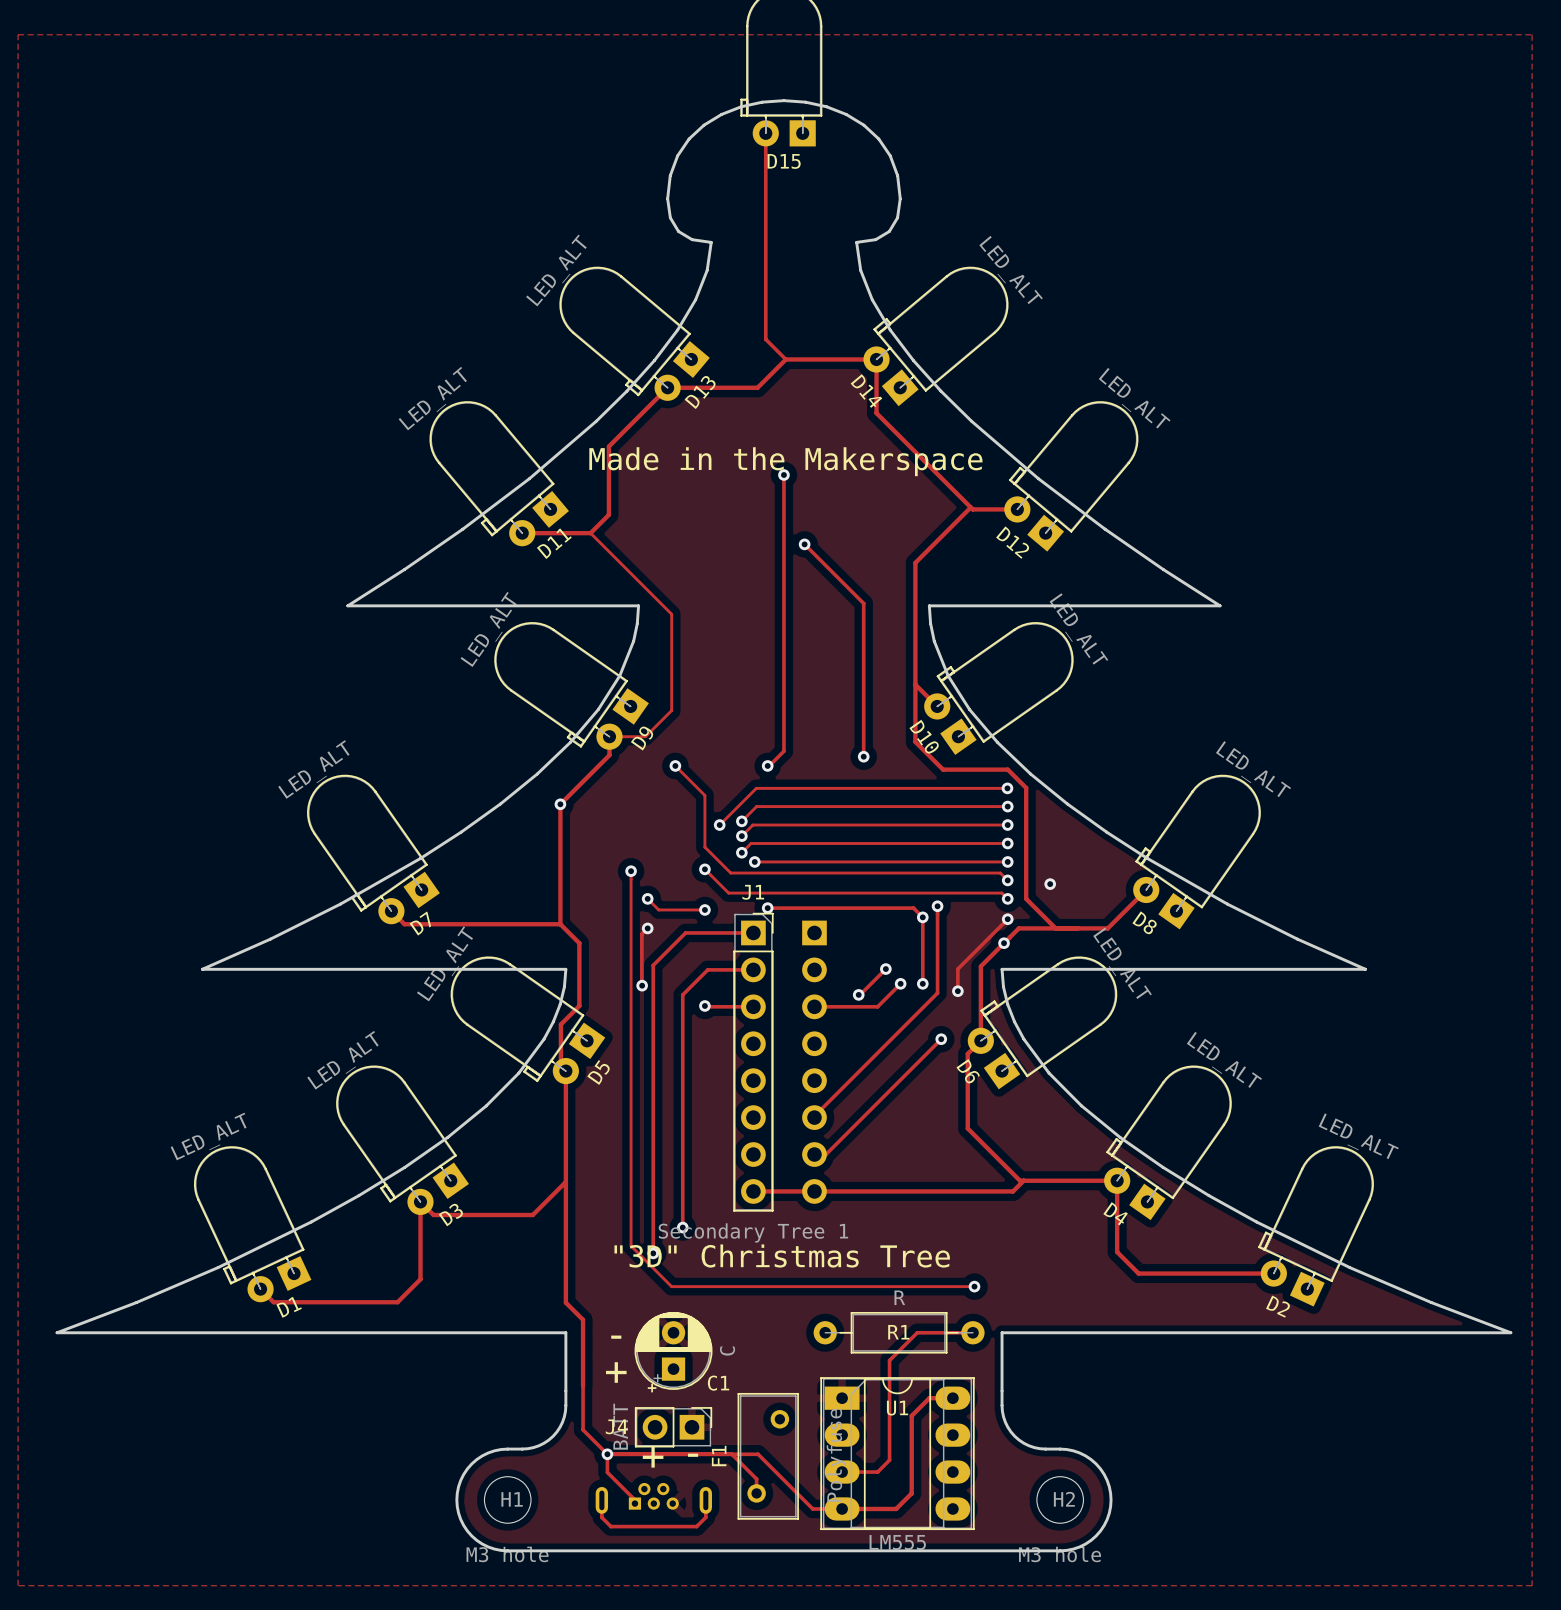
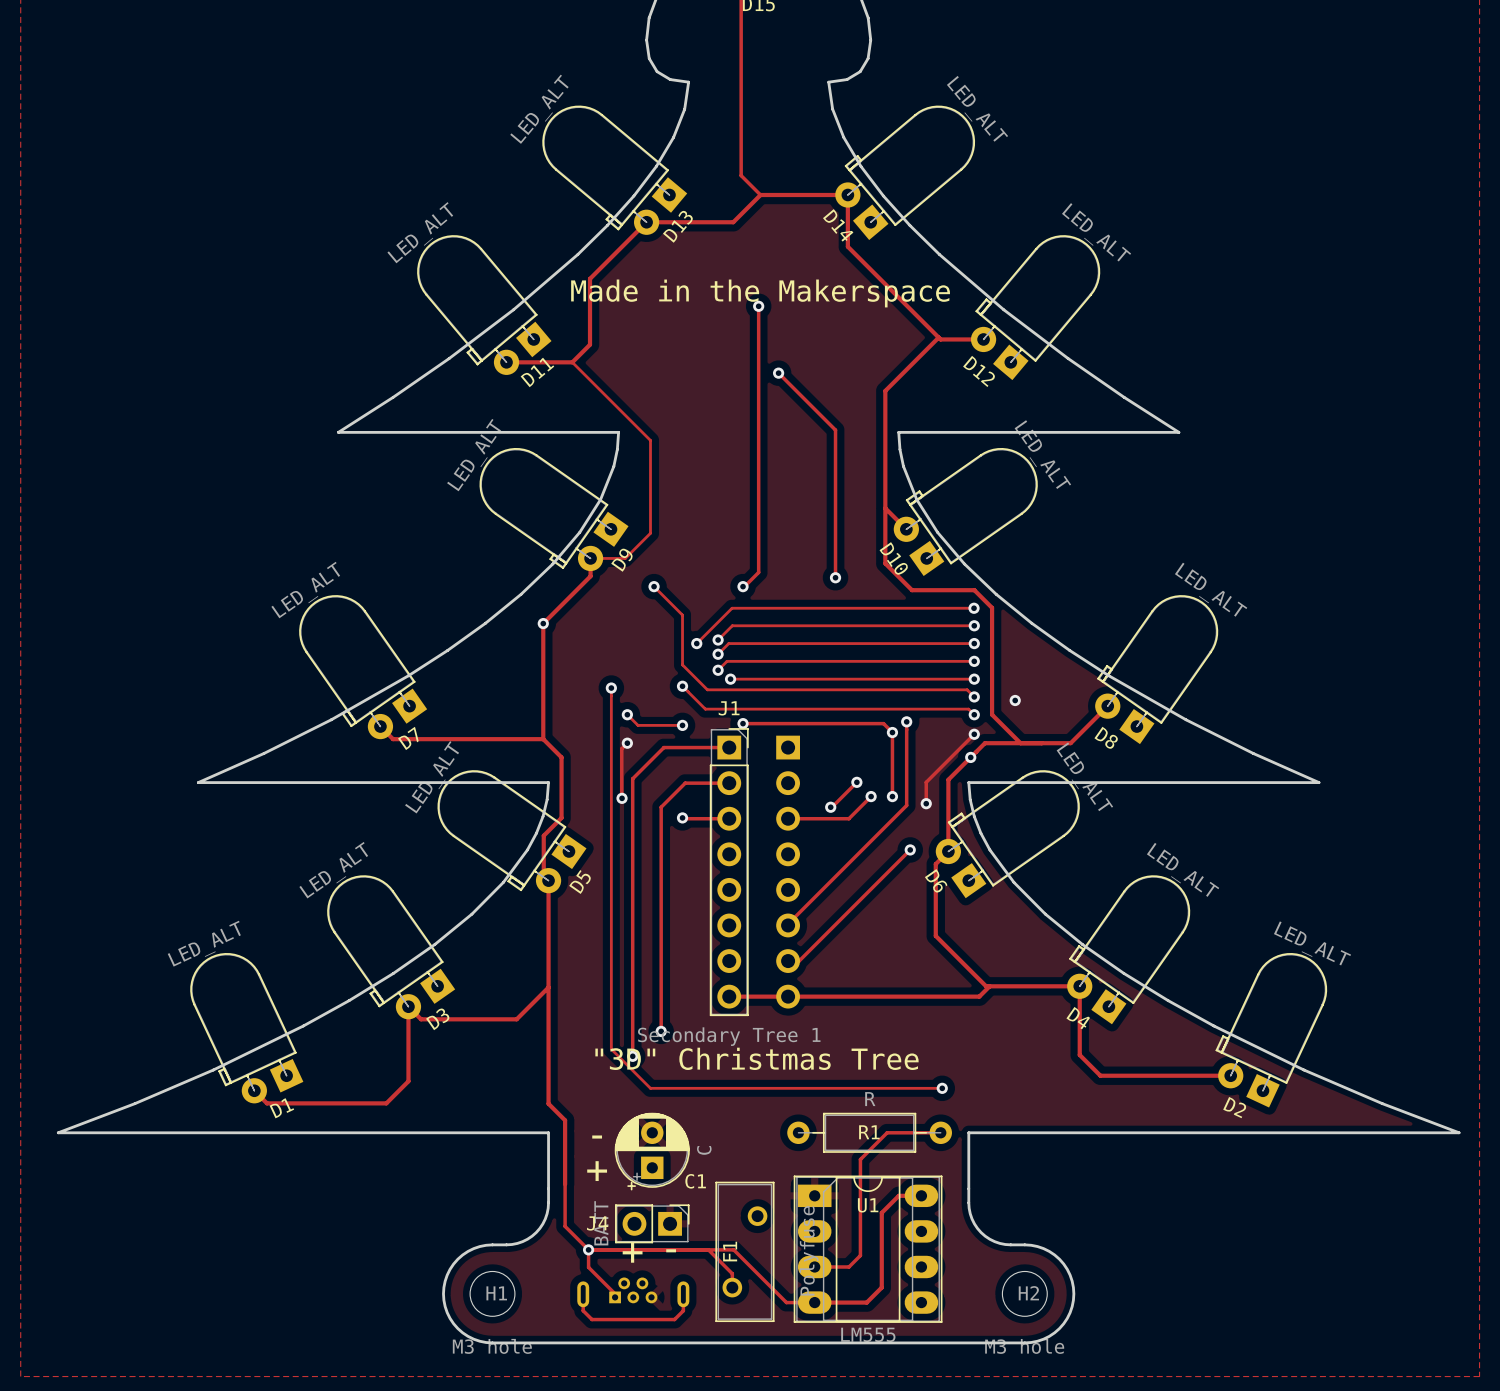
F1 footprint: [737, 1392, 799, 1520] -> [715, 1181, 775, 1323]
F1 name position: F1 (719, 1456) -> F1 (730, 1251)

